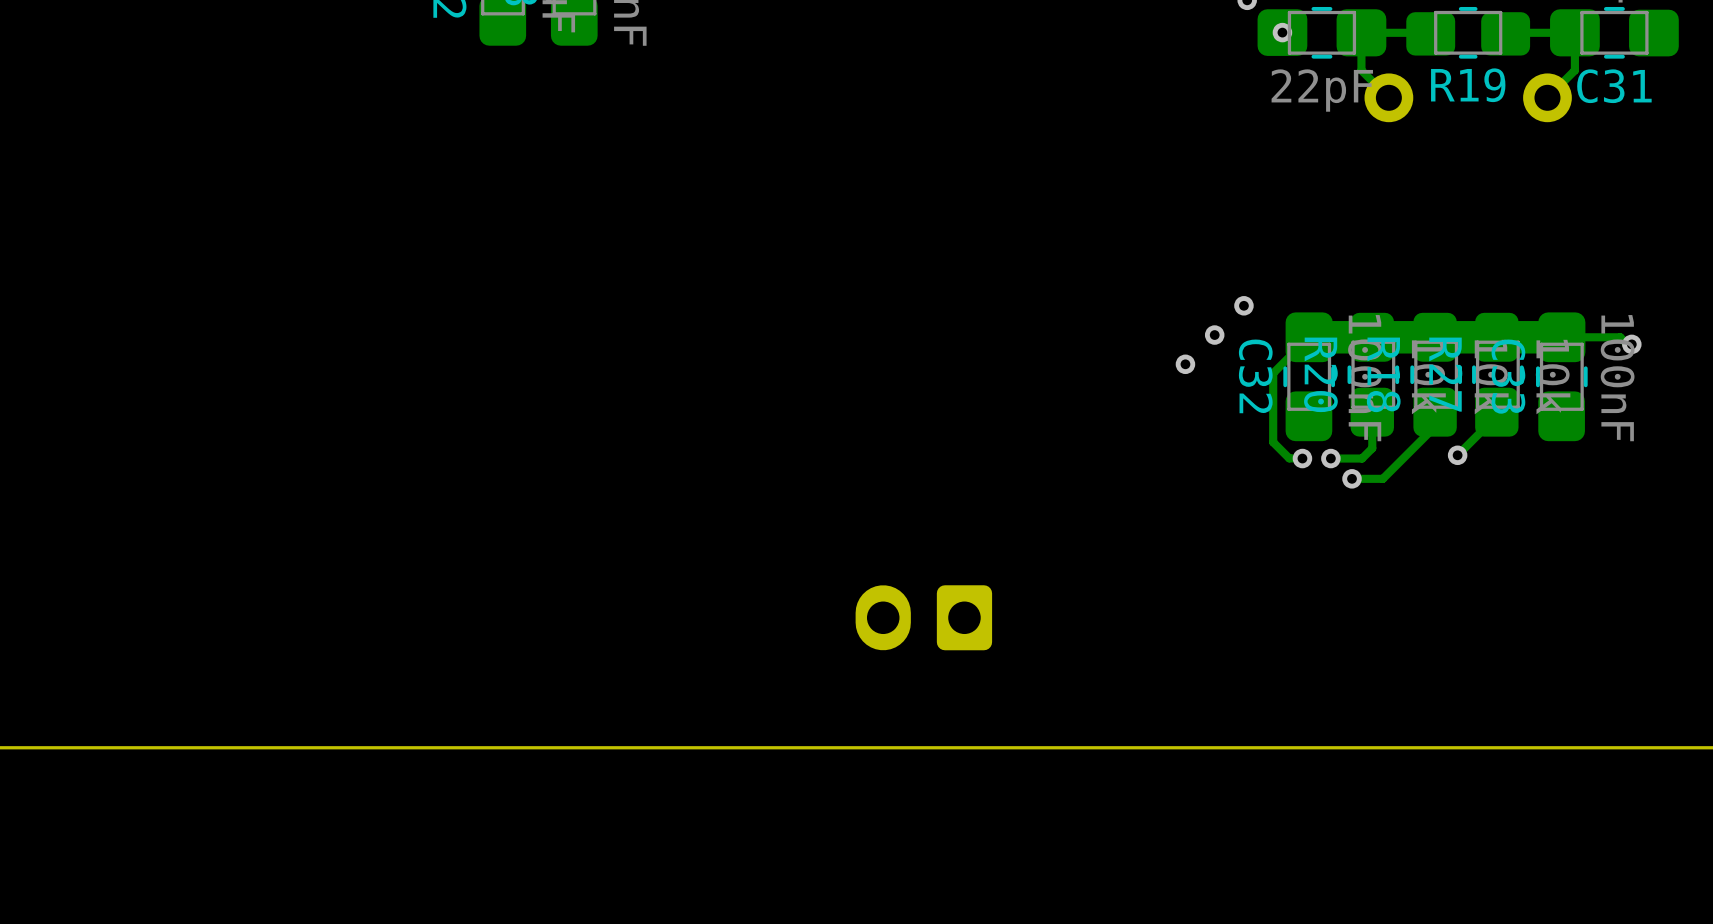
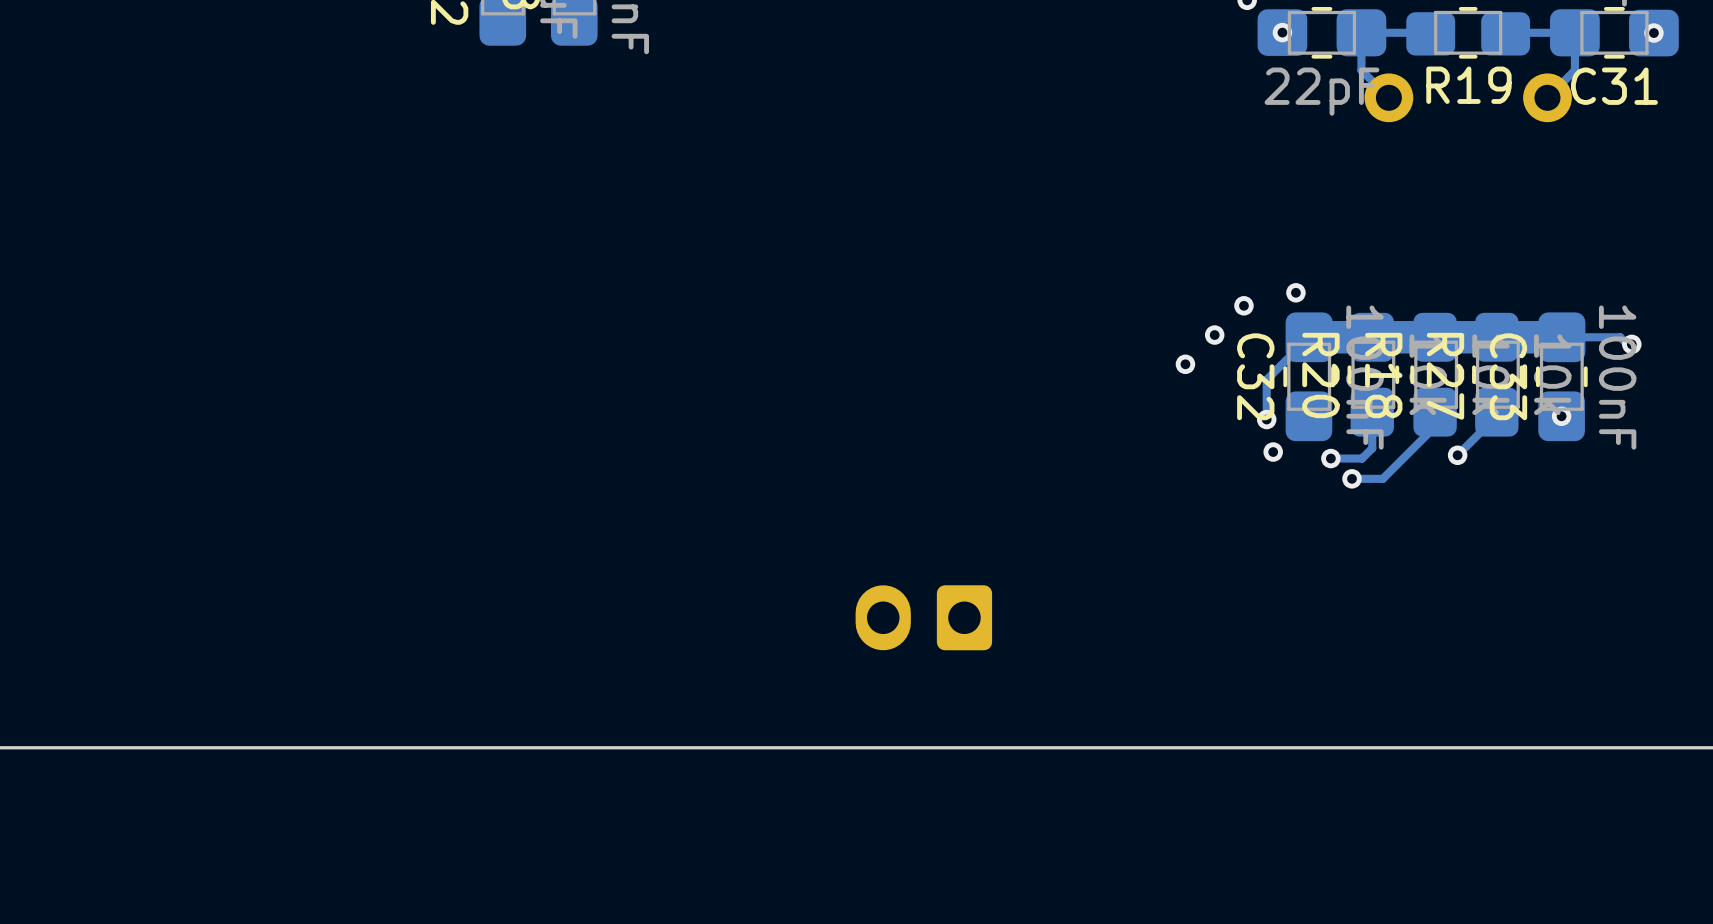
via: none -> (1653, 33)
via: none -> (1295, 292)
track: (1273, 373) (1273, 442) (1289, 458) (1302, 458) -> (1273, 373) (1266, 379) (1266, 419) (1269, 419)
via: none -> (1561, 416)
via: none -> (1266, 419)
via: none -> (1273, 452)
via: (1302, 458) -> none

